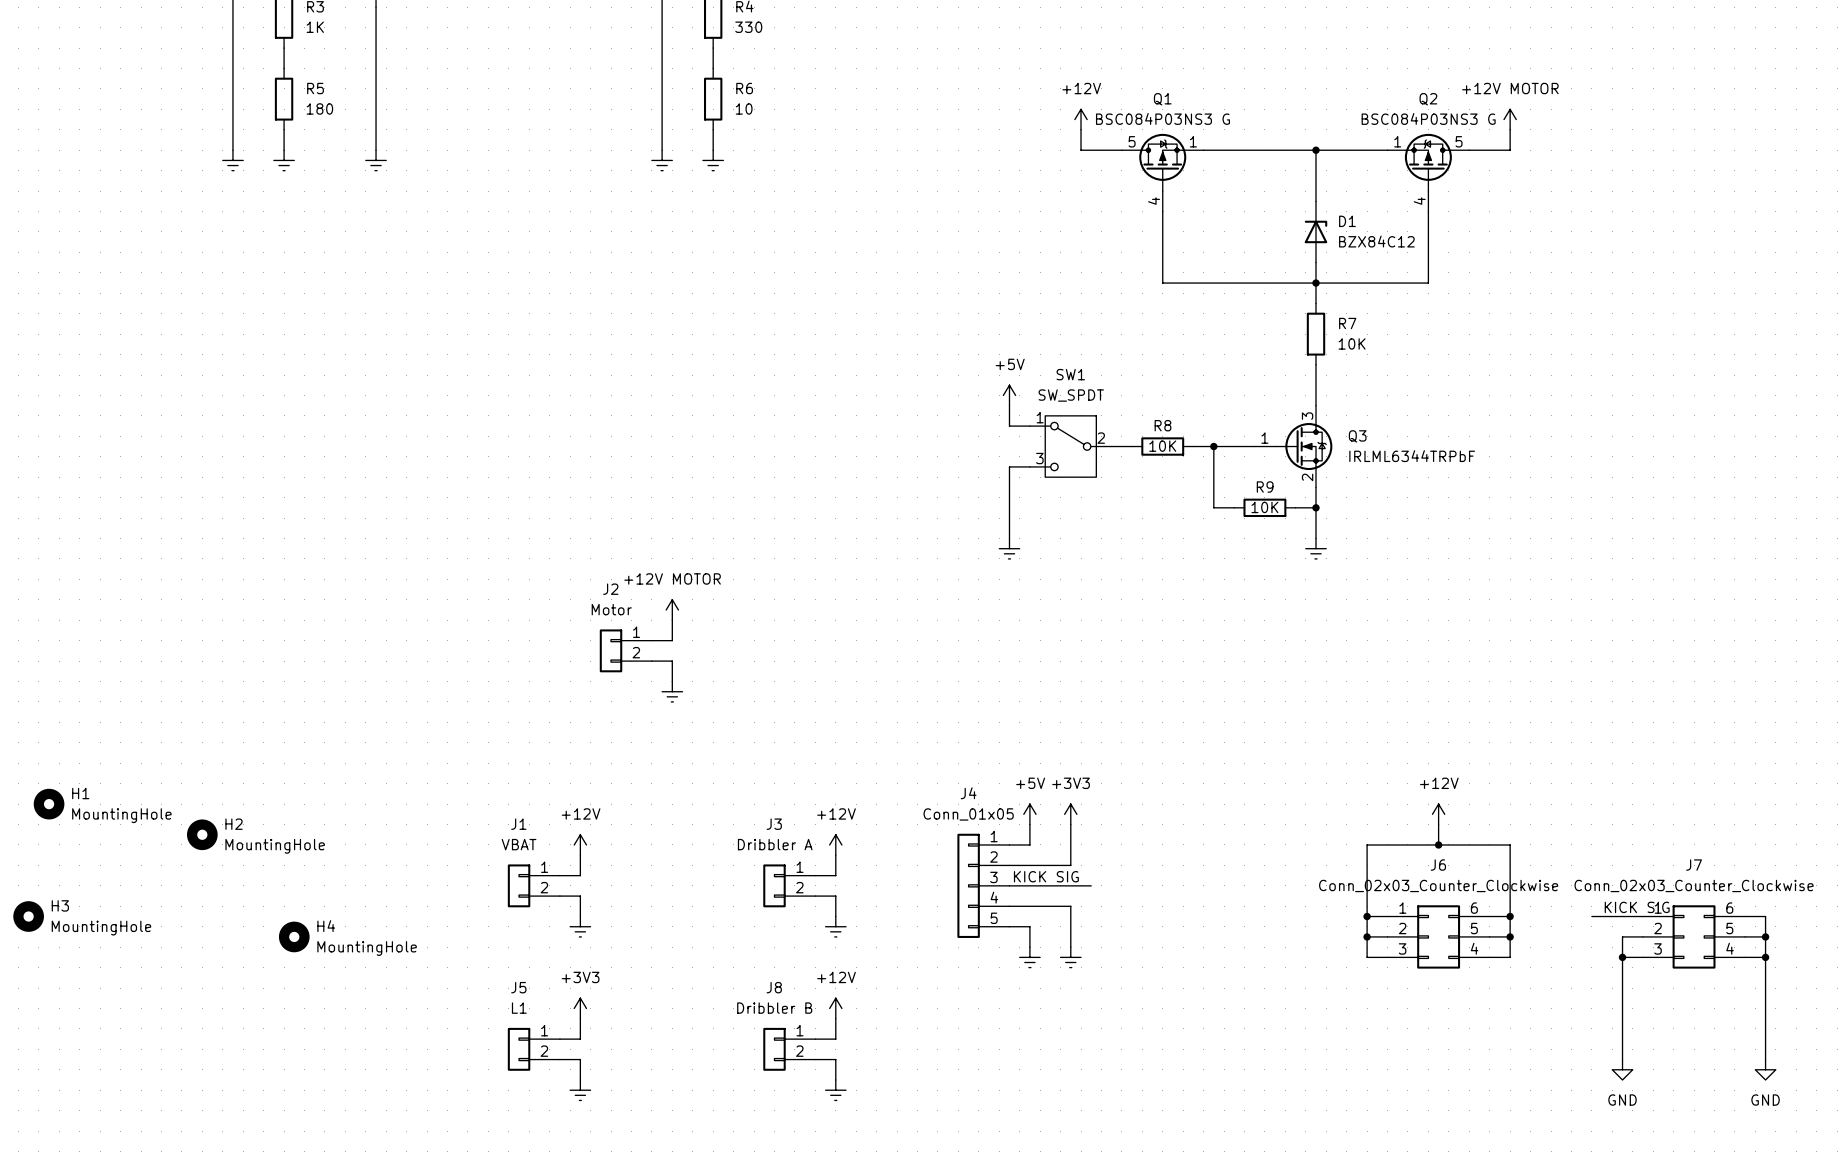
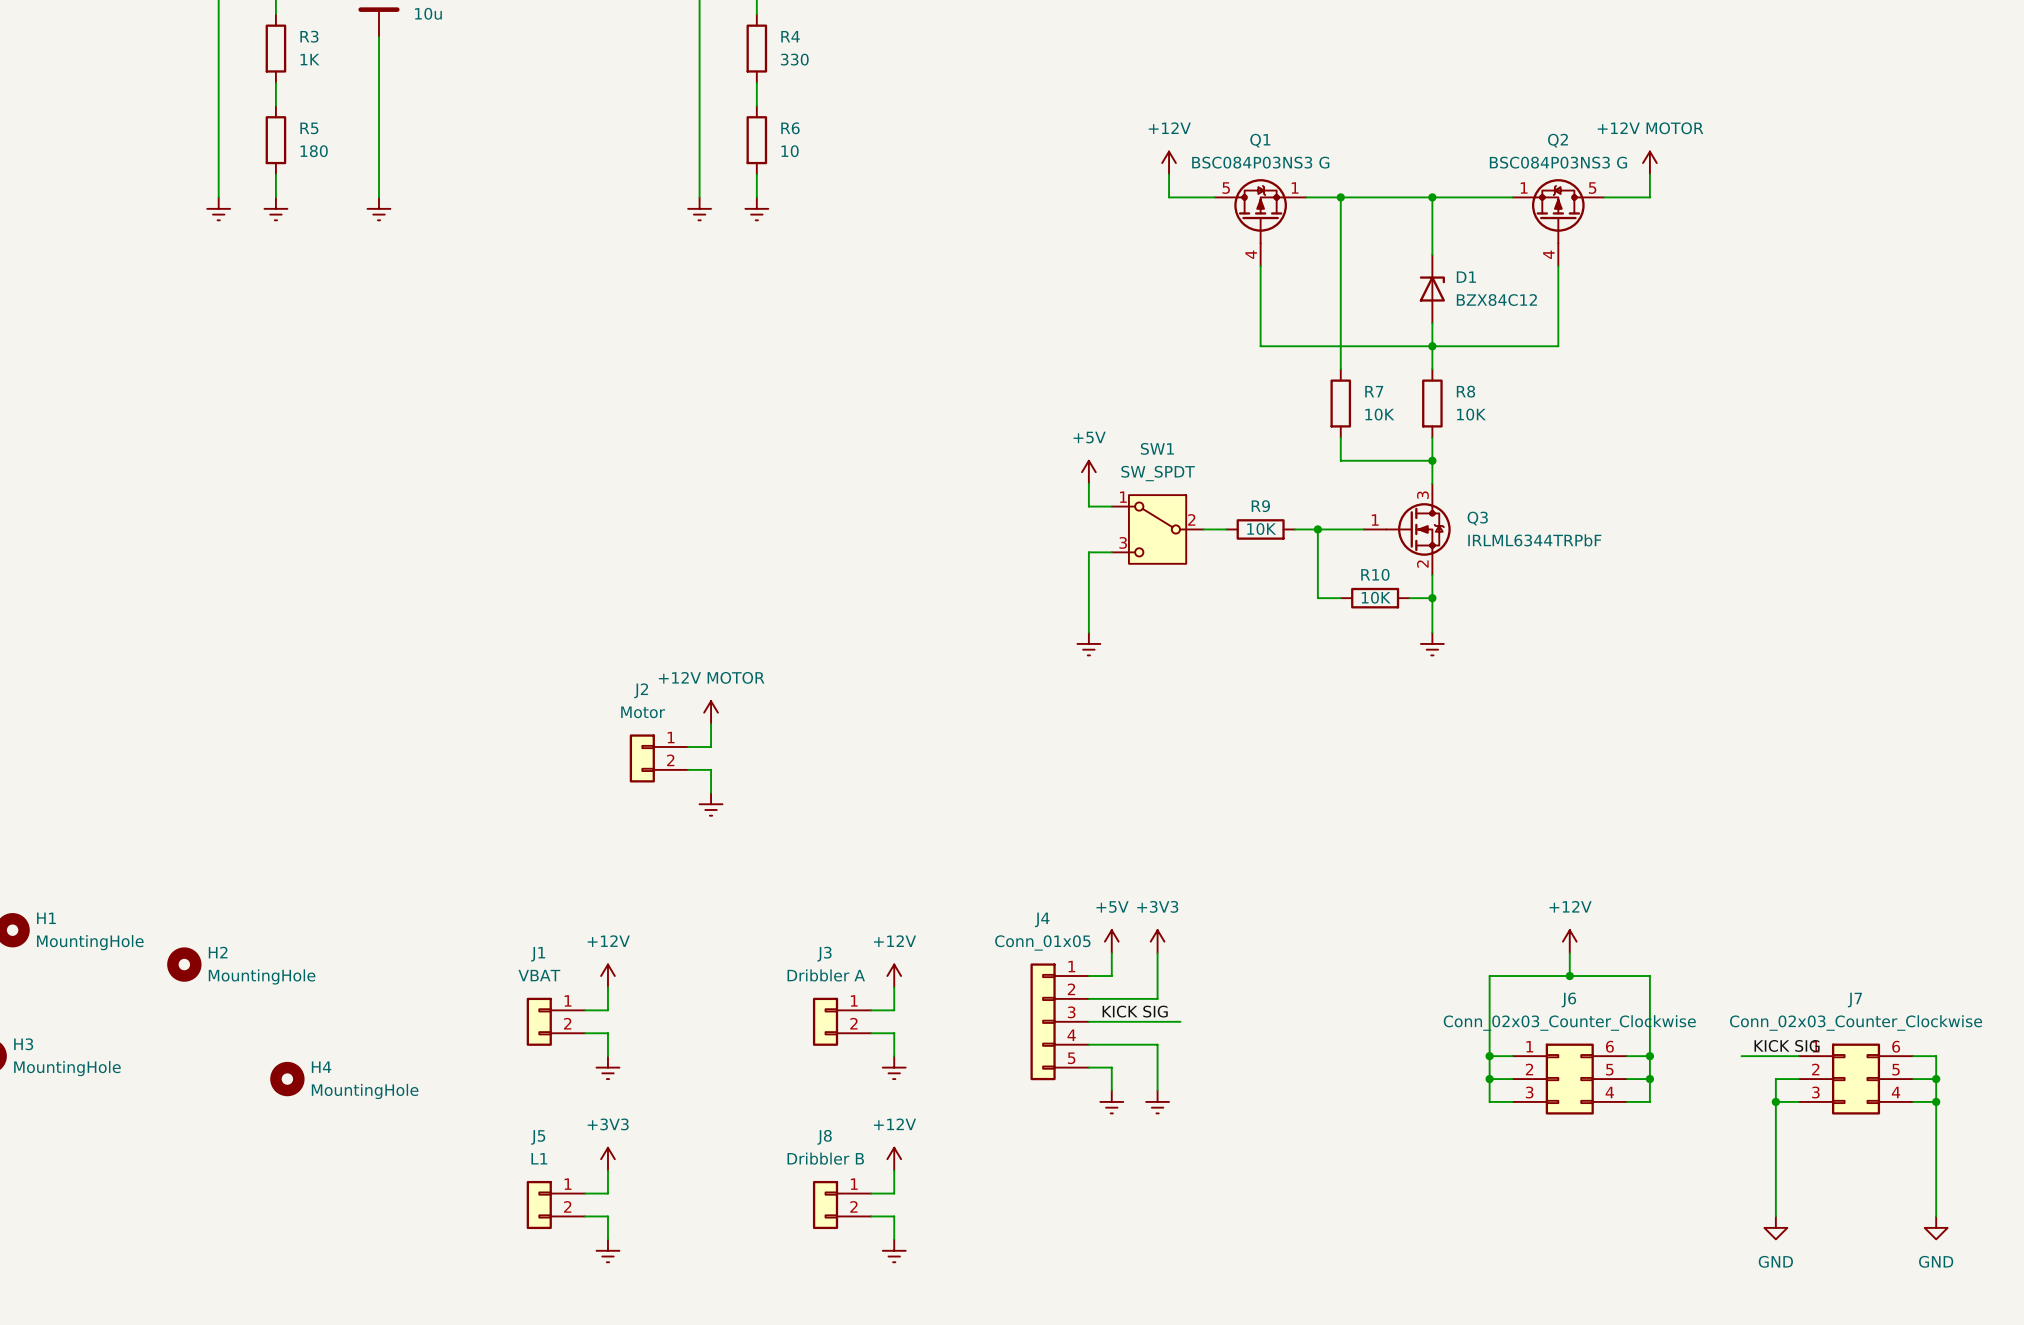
wire: none -> (1340, 197) (1340, 369)
junction: none -> (1340, 197)
R7 name: R7 (1347, 323) -> R8 (1465, 391)
R7: none -> 10K (1340, 403)
wire: none -> (1340, 437) (1340, 460) (1432, 460)
junction: none -> (1432, 460)
R8 name: R8 (1162, 425) -> R9 (1260, 506)
R9 name: R9 (1265, 487) -> R10 (1375, 574)

